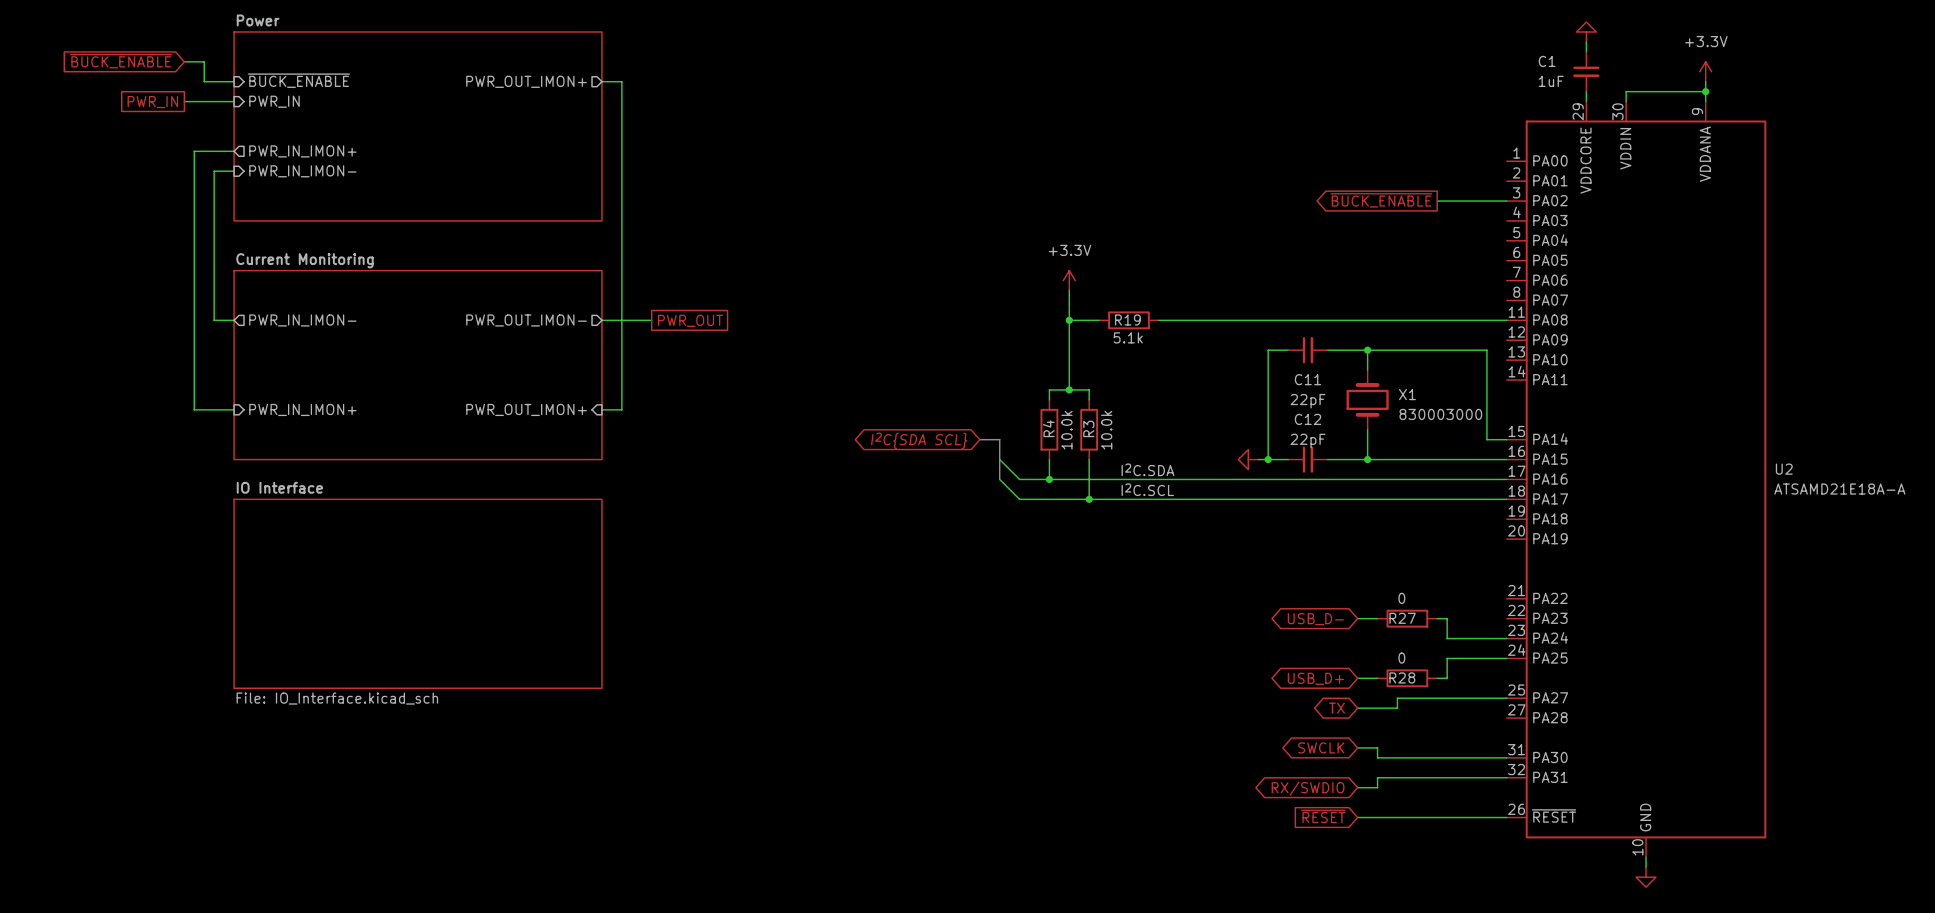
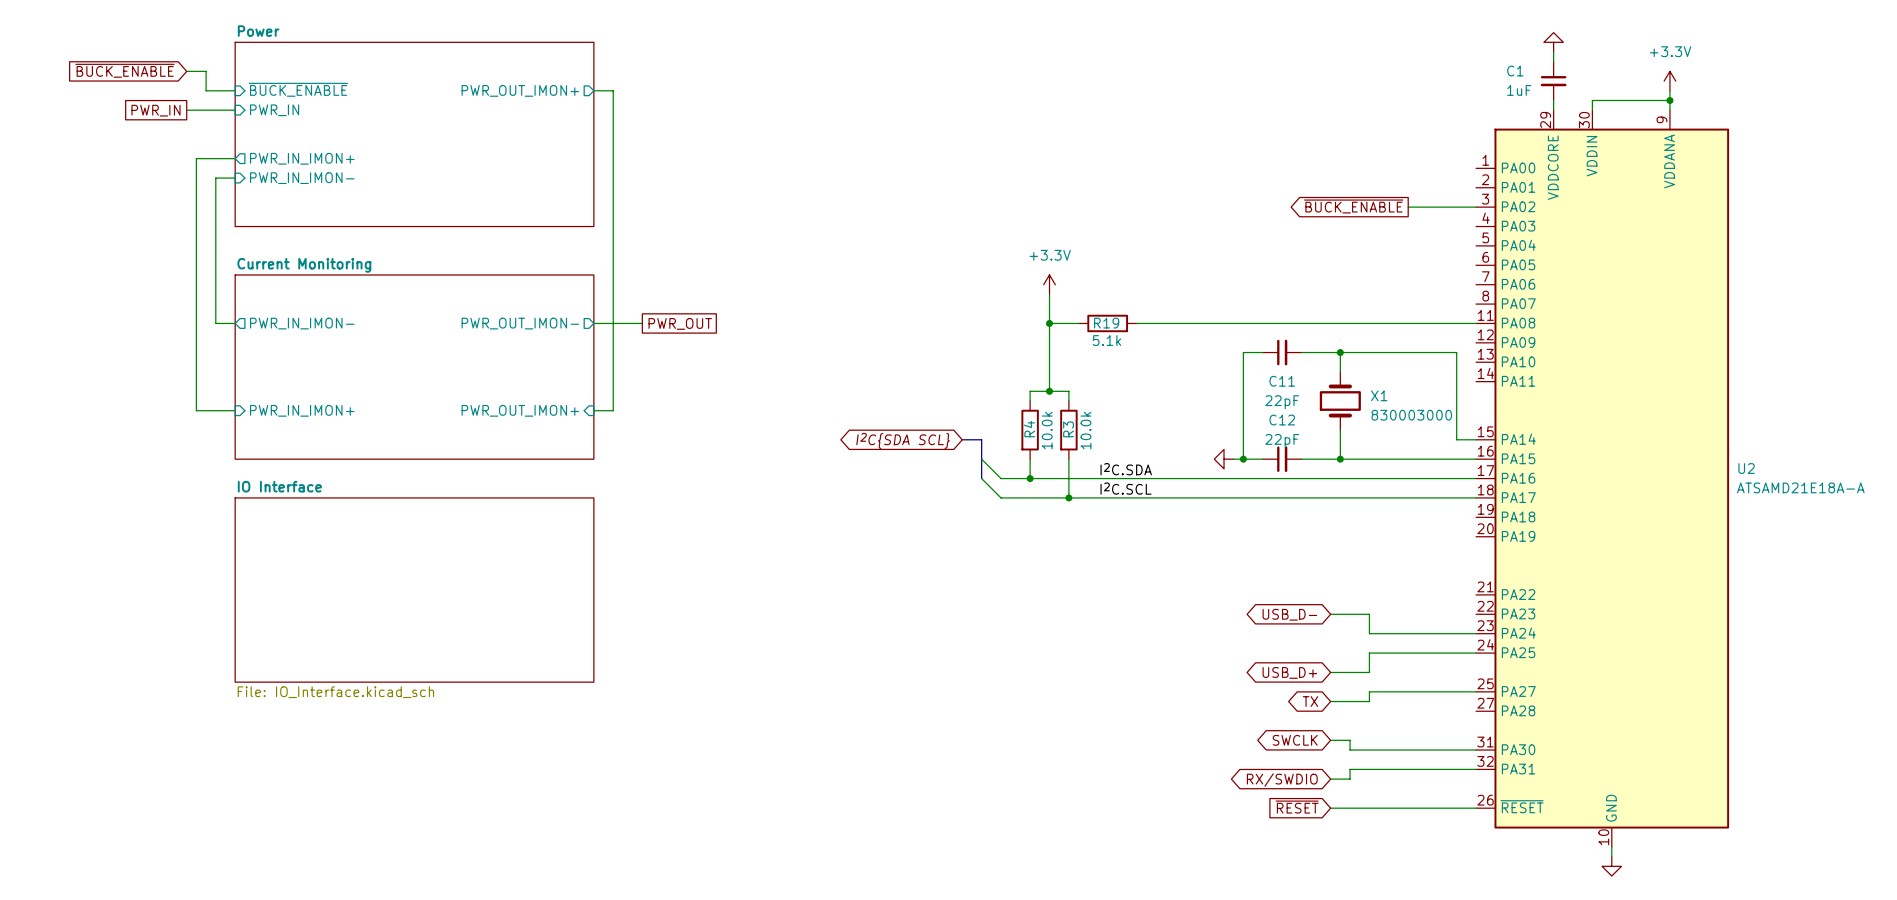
R27: 0 (1407, 618) -> none
wire: (1437, 618) (1447, 618) (1447, 638) -> (1350, 614) (1369, 614) (1369, 633) (1417, 633)
wire: (1447, 658) (1447, 678) (1437, 678) -> (1417, 653) (1369, 653) (1369, 672) (1350, 672)
R28: 0 (1407, 678) -> none

